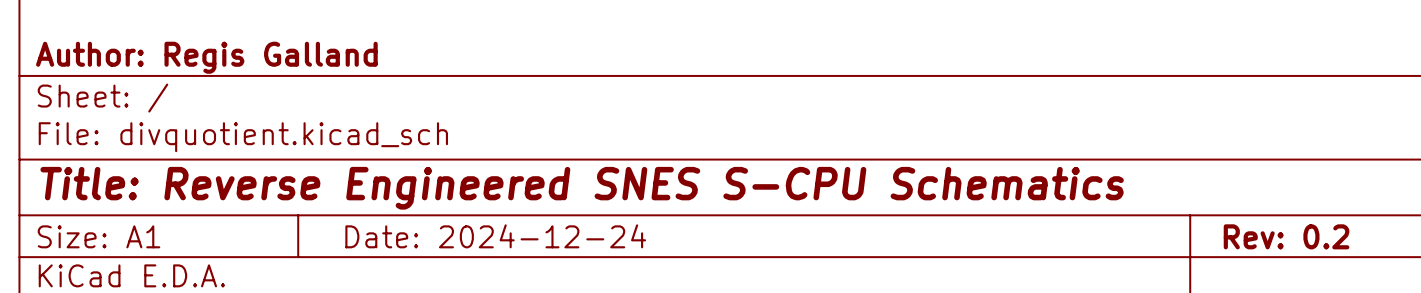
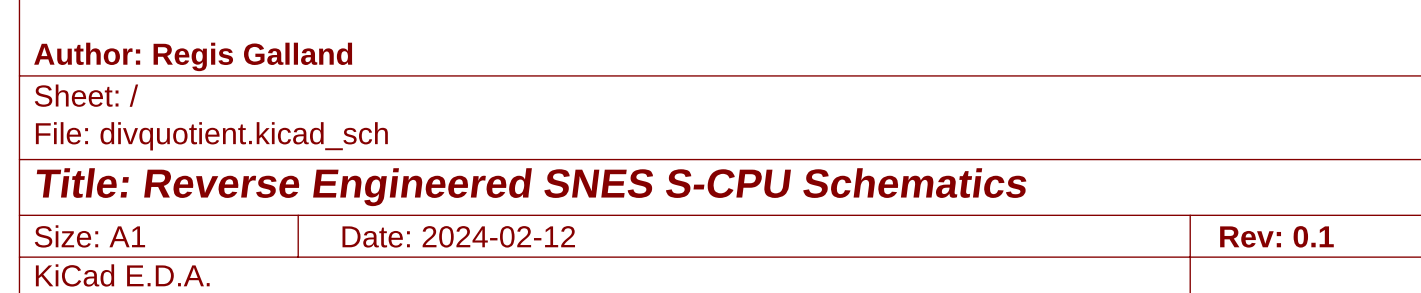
title block: Date: 2024-12-24 (495, 236) -> Date: 2024-02-12 (458, 236)
title block: Rev: 0.2 (1286, 236) -> Rev: 0.1 (1276, 236)

